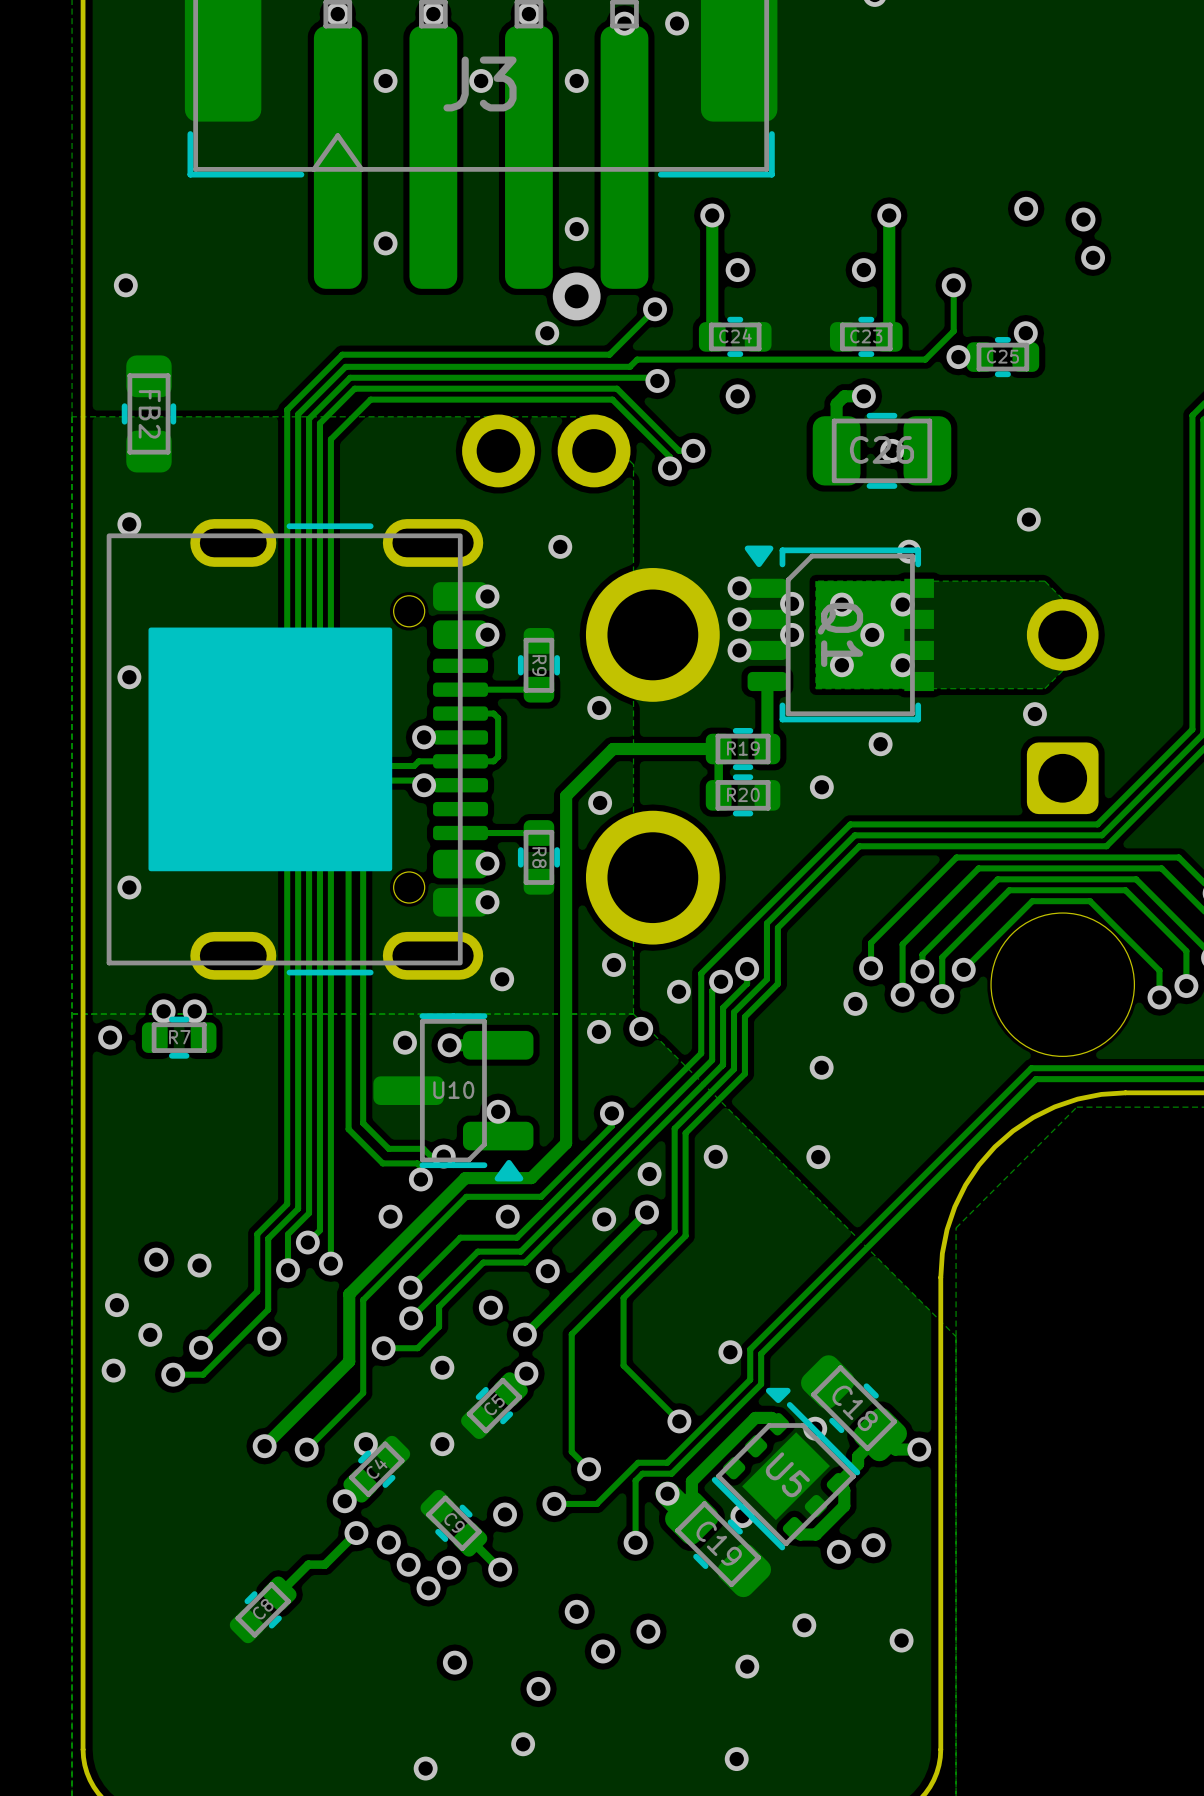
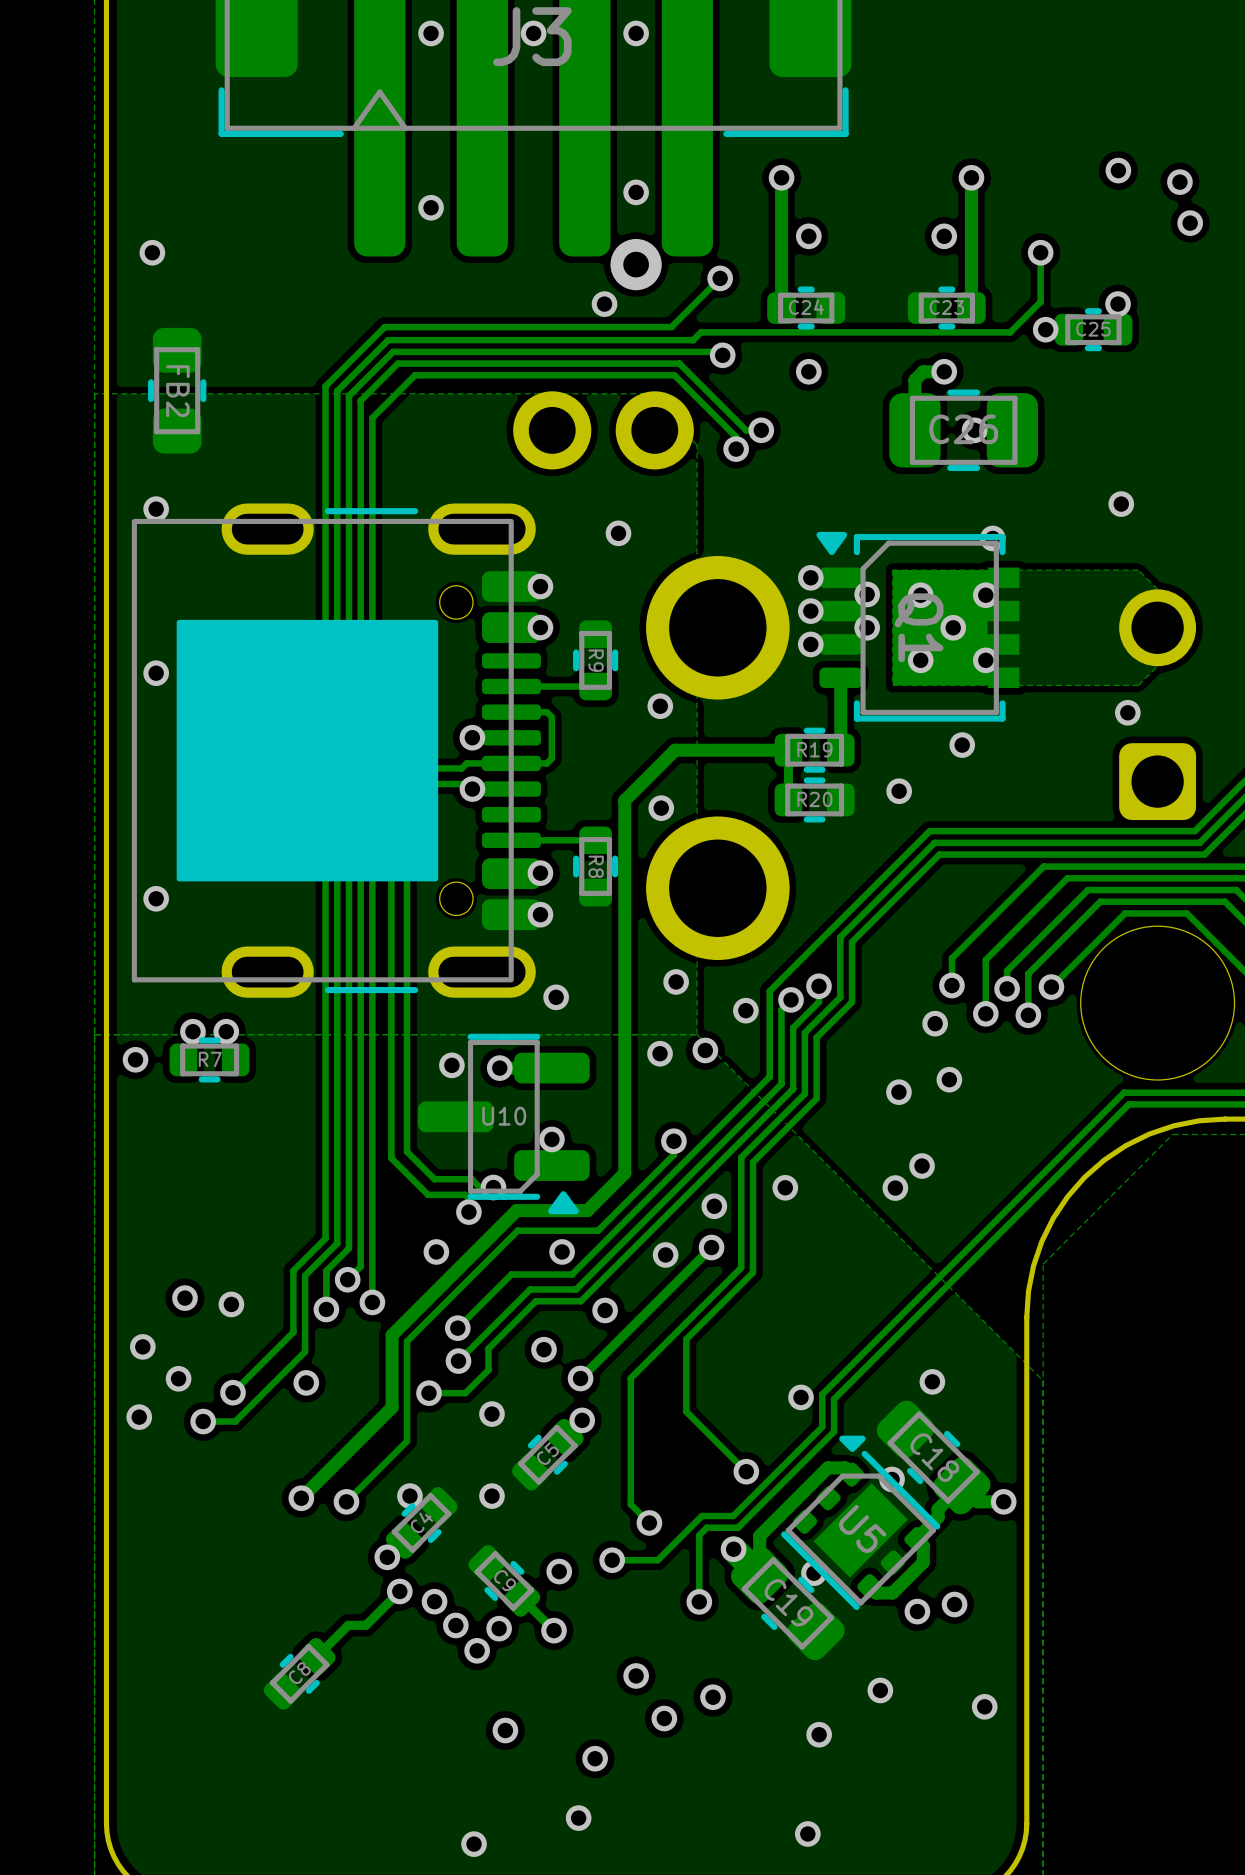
via: none -> (949, 1079)
via: none -> (922, 1166)
via: none -> (932, 1381)

